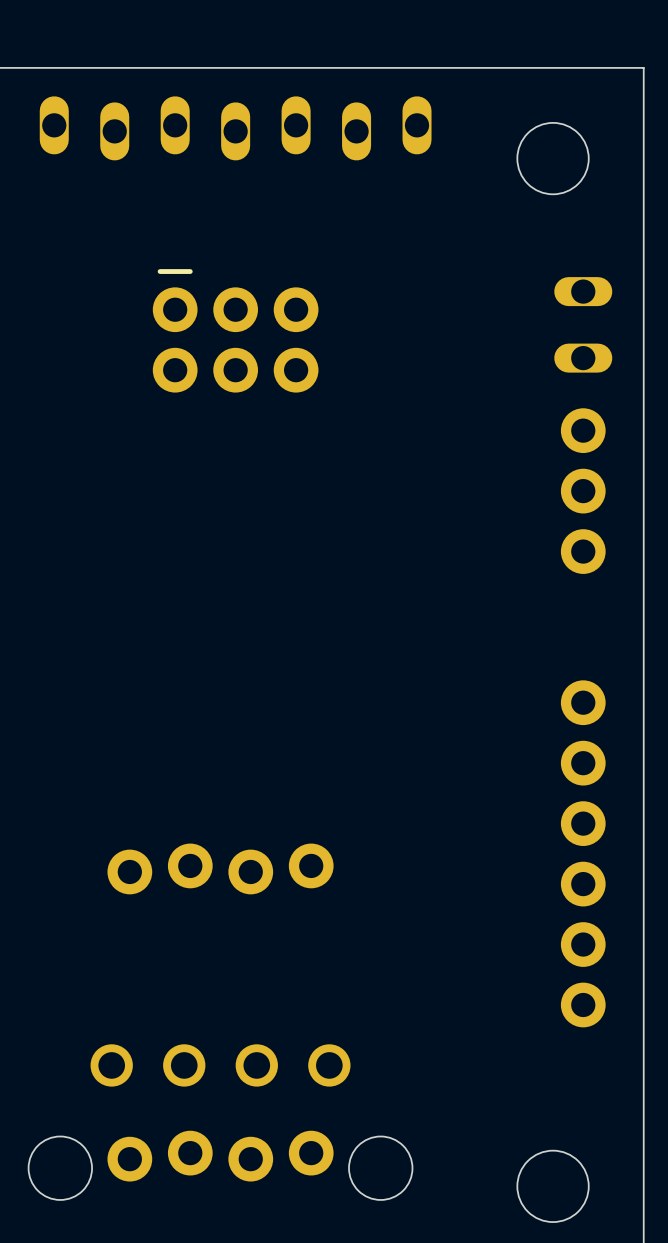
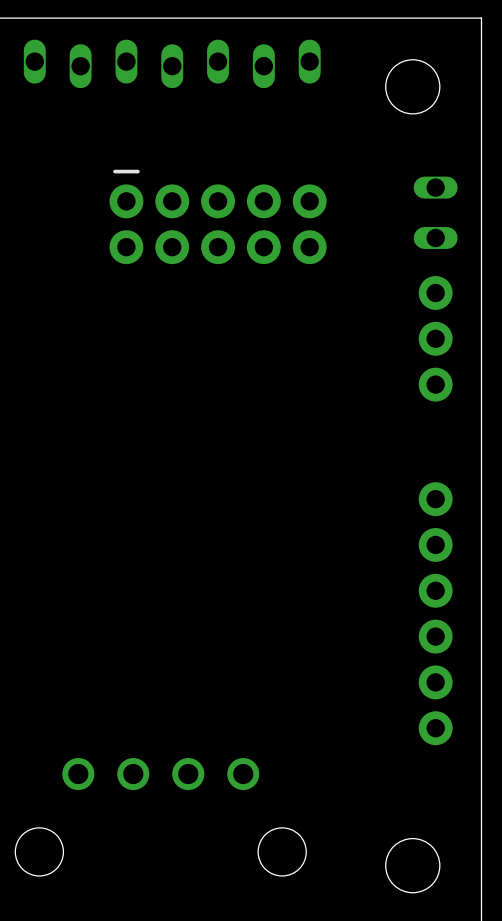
part: (235, 330) -> none
part: none -> (218, 216)
part: (220, 868) -> none
part: (220, 1156) -> none

